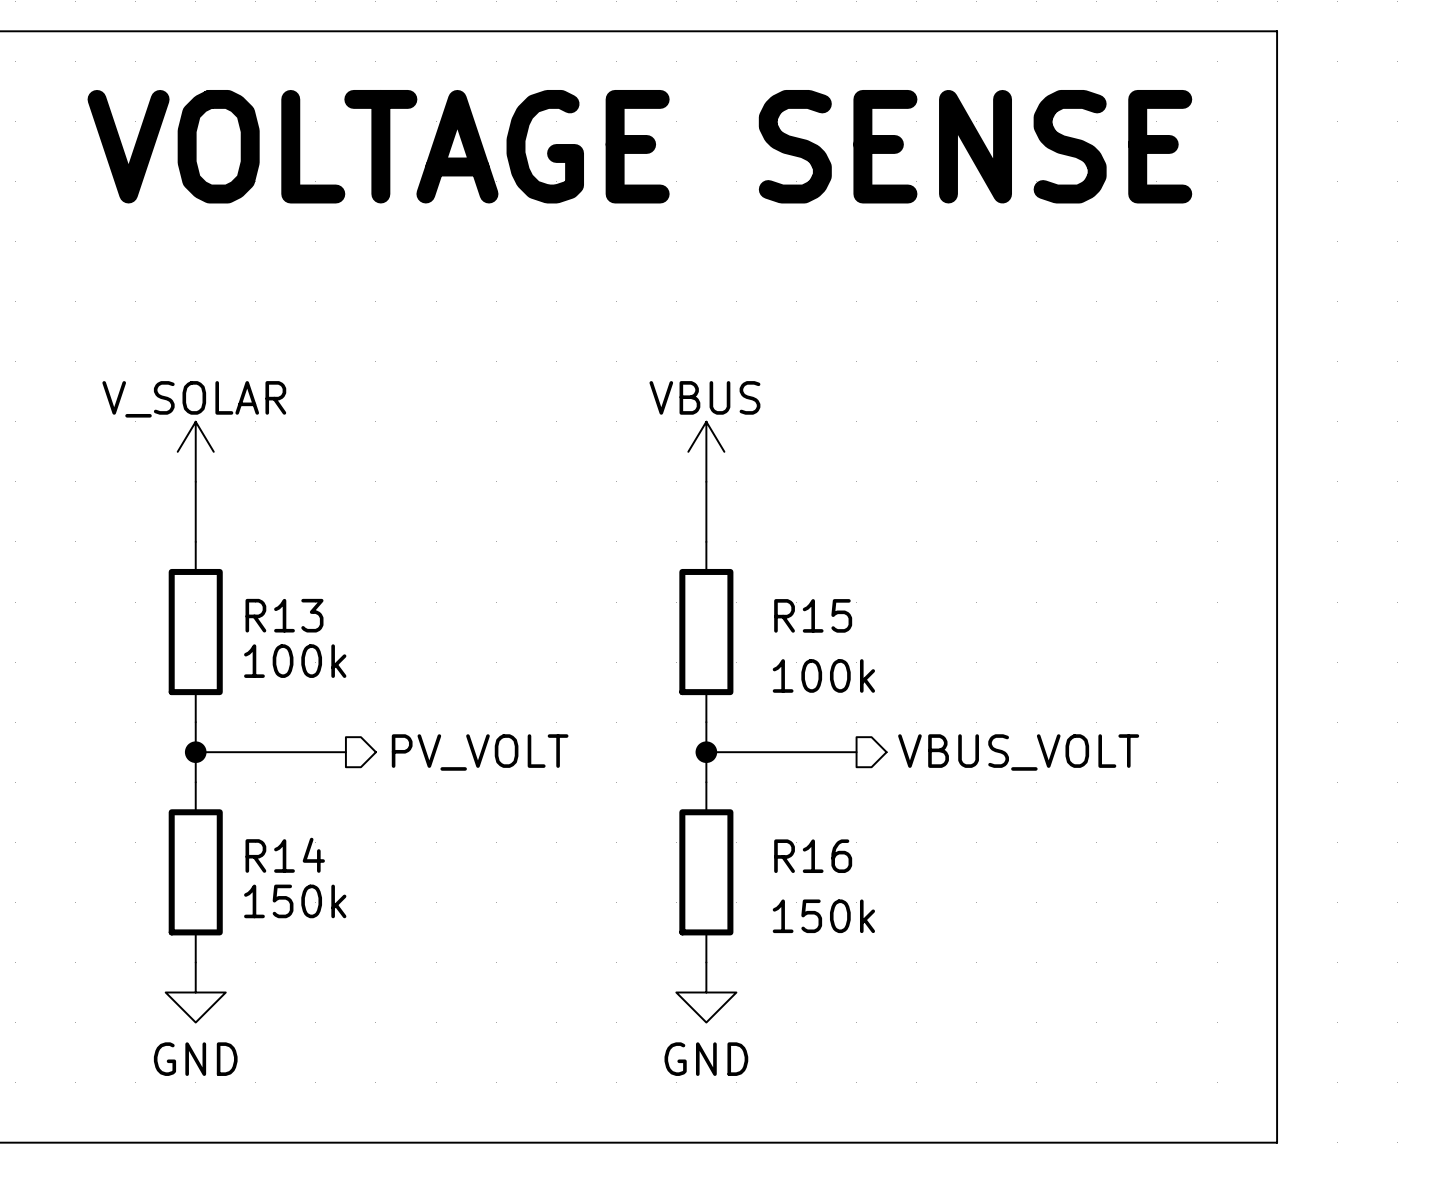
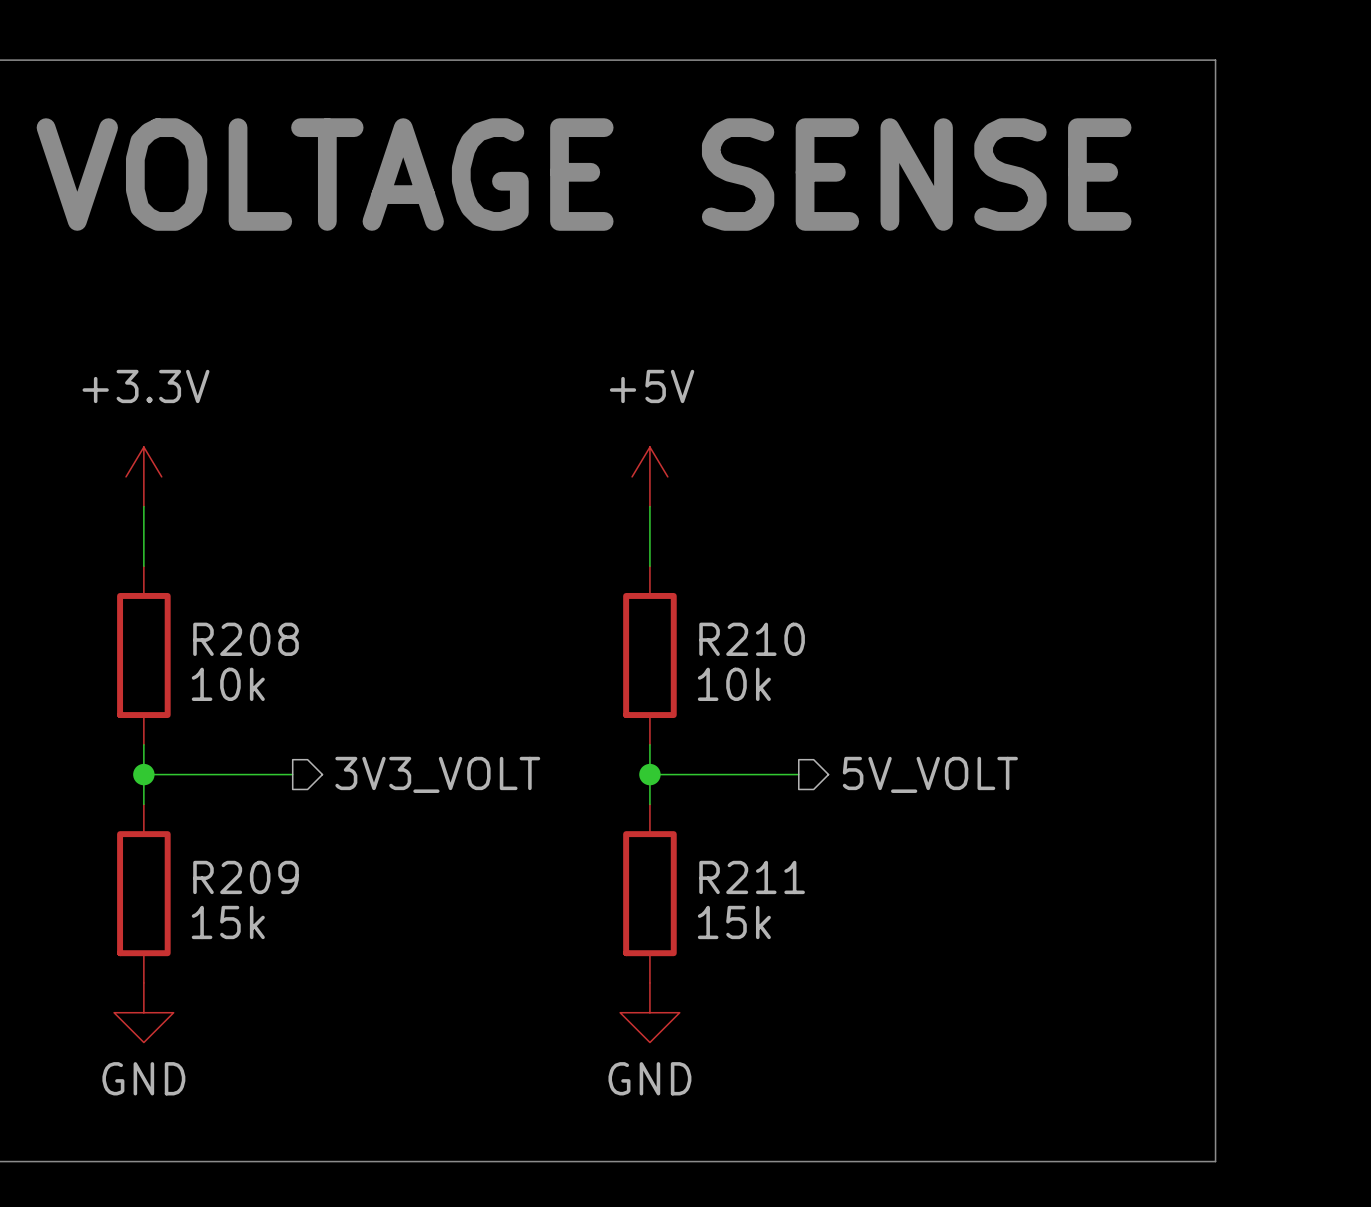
power symbol: V_SOLAR (195, 451) -> +3.3V (143, 476)
power symbol: VBUS (706, 451) -> +5V (649, 476)
R13 name: R13 (284, 615) -> R208 (246, 639)
R15 name: R15 (813, 615) -> R210 (752, 639)
R13 value: 100k (295, 661) -> 10k (228, 684)
R15 value: 100k (823, 675) -> 10k (734, 684)
hierarchical label: PV_VOLT (480, 752) -> 3V3_VOLT (437, 774)
hierarchical label: VBUS_VOLT (1018, 752) -> 5V_VOLT (930, 774)
R14 name: R14 (285, 855) -> R209 (246, 877)
R16 name: R16 (813, 856) -> R211 (752, 877)
R14 value: 150k (295, 901) -> 15k (228, 922)
R16 value: 150k (823, 916) -> 15k (734, 922)

